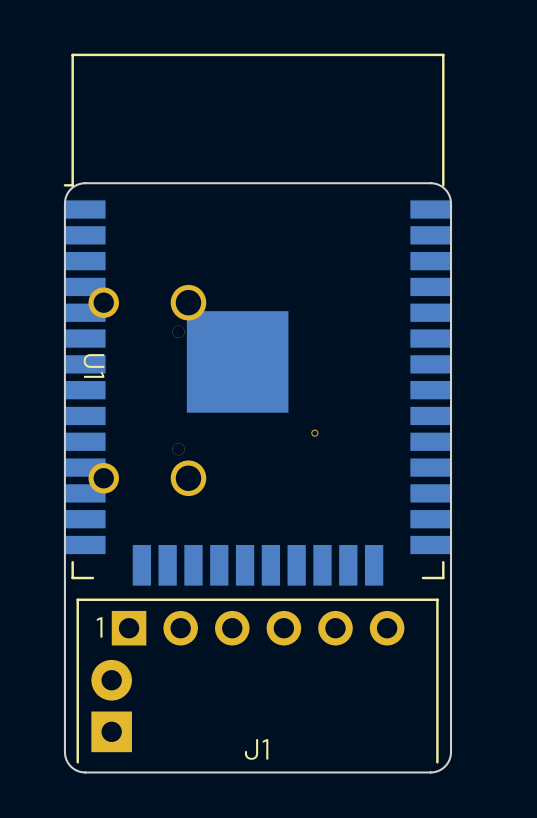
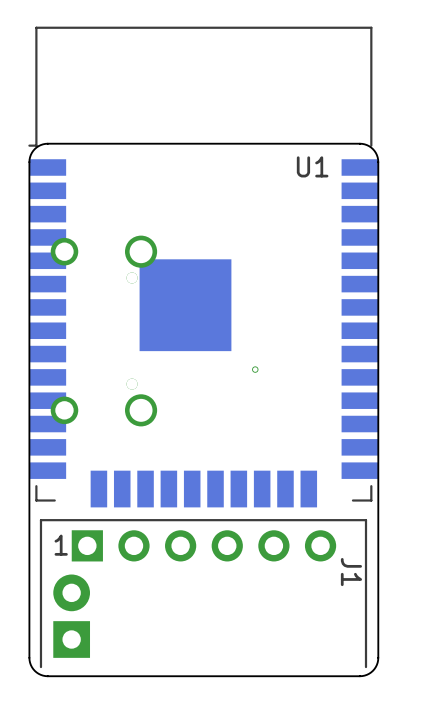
U1 name rotation: 0° (94, 365) -> 90° counterclockwise (312, 166)
U1 name position: U1 (94, 365) -> U1 (312, 166)
J1 name rotation: 0° (256, 749) -> 90° clockwise (351, 572)
J1 name position: J1 (256, 749) -> J1 (351, 572)

